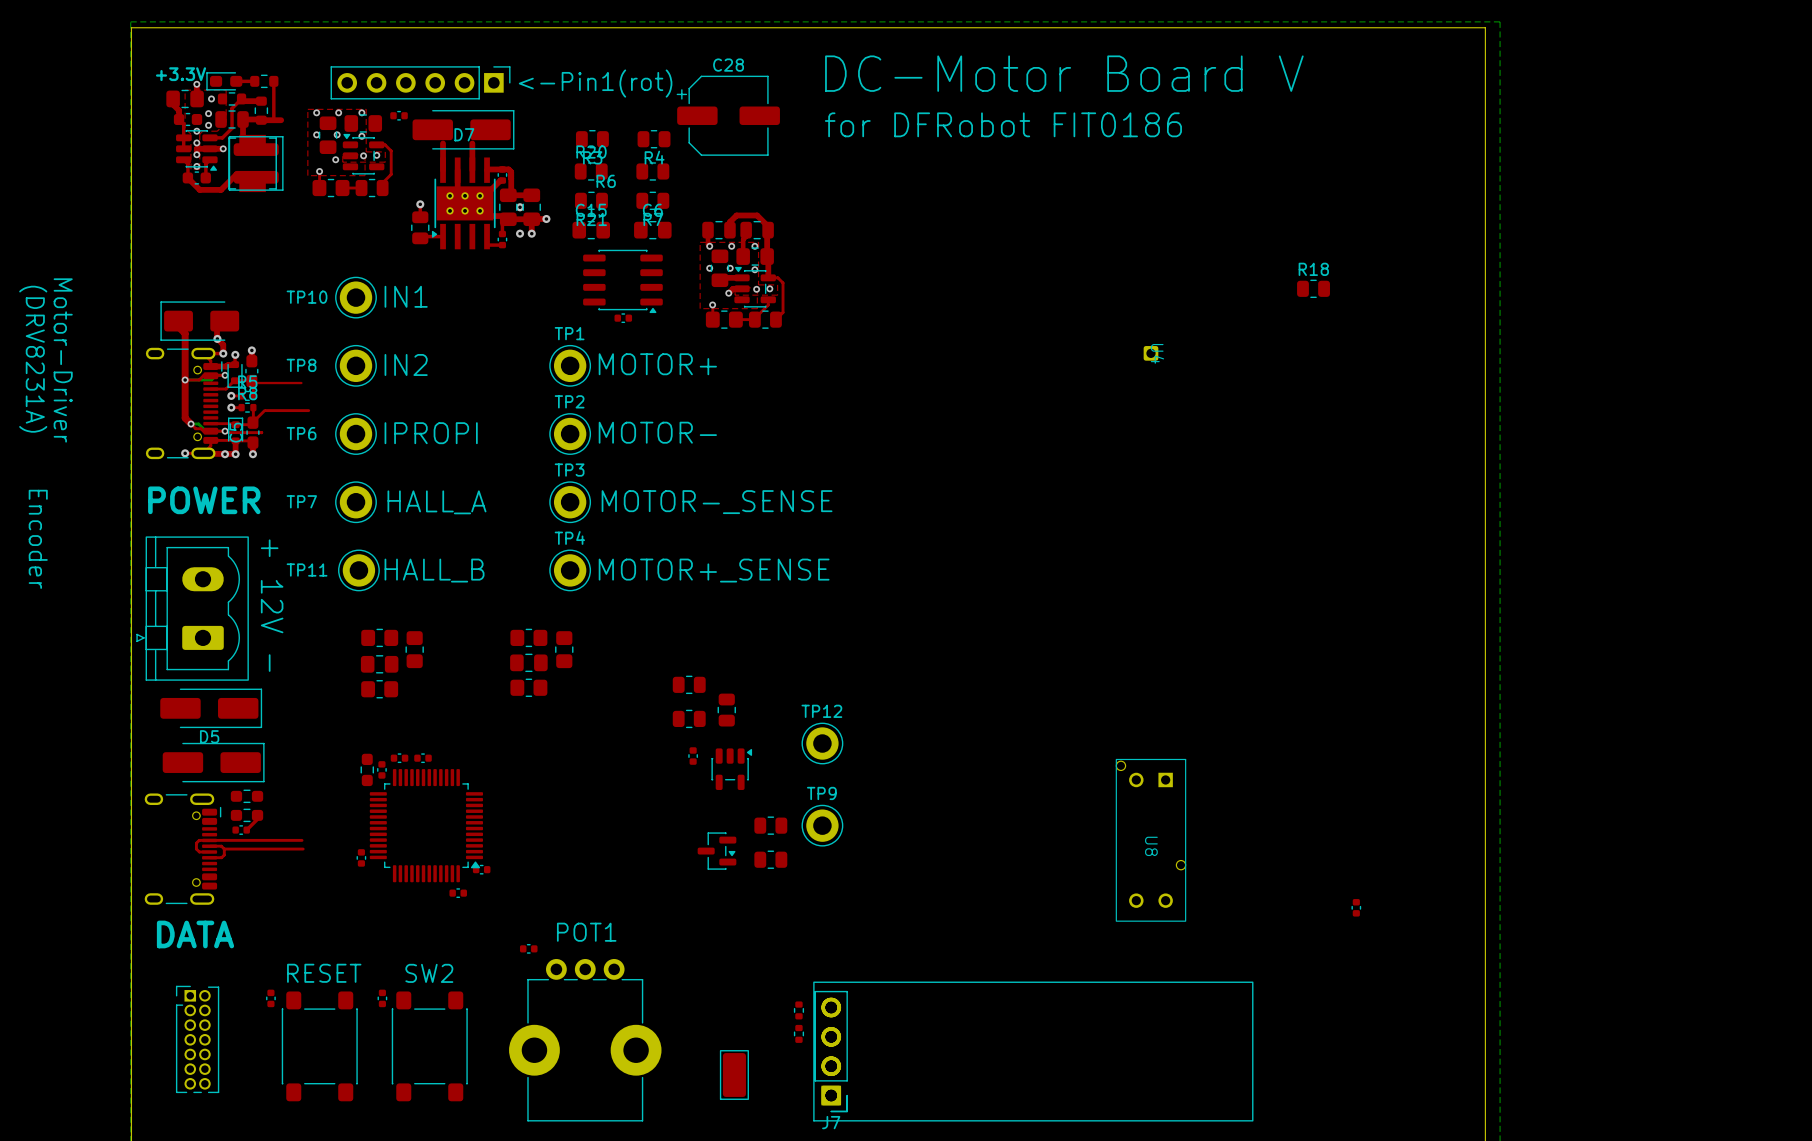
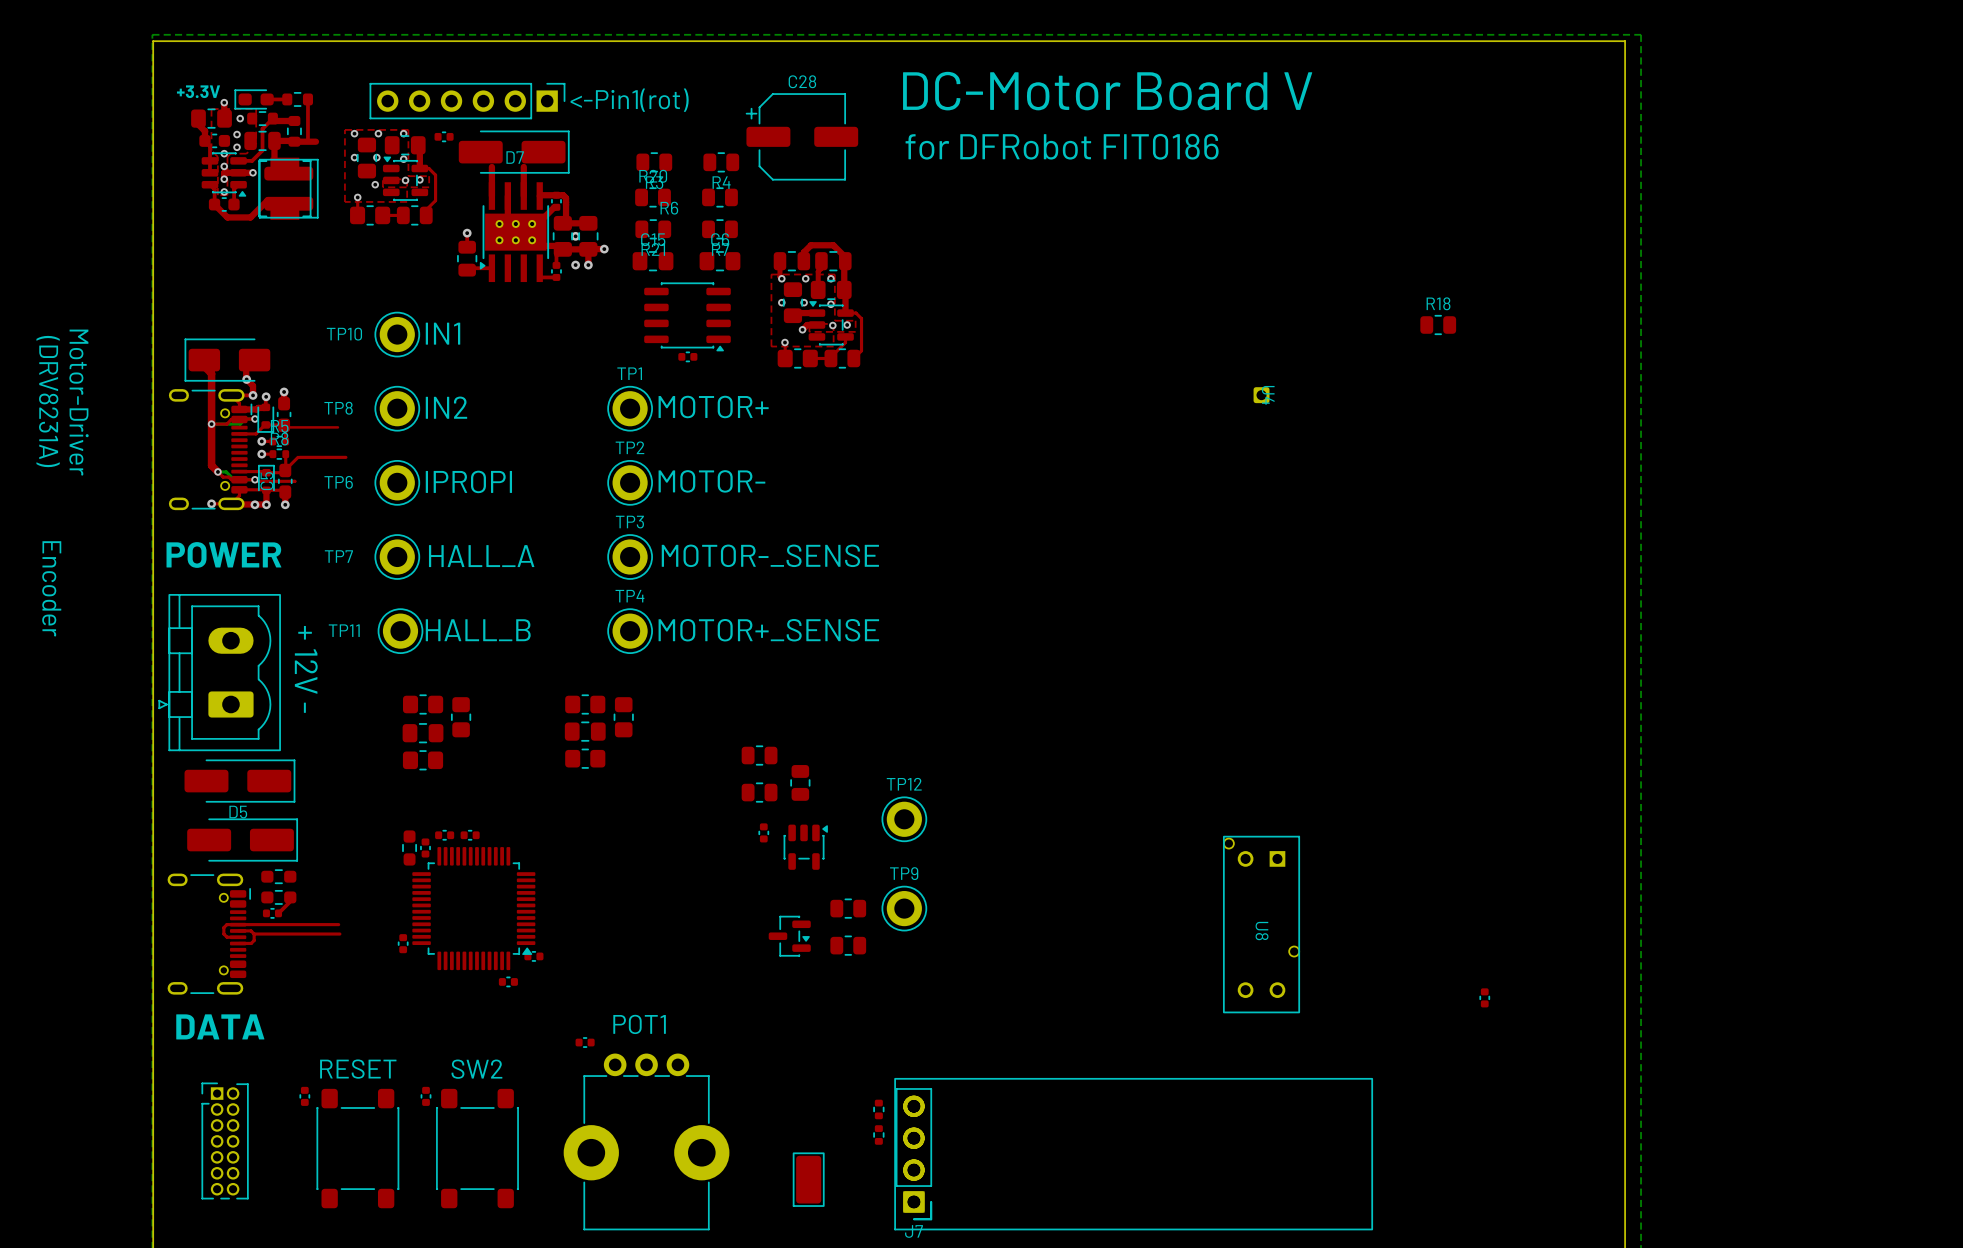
top track: none -> (418, 145) (419, 168)

